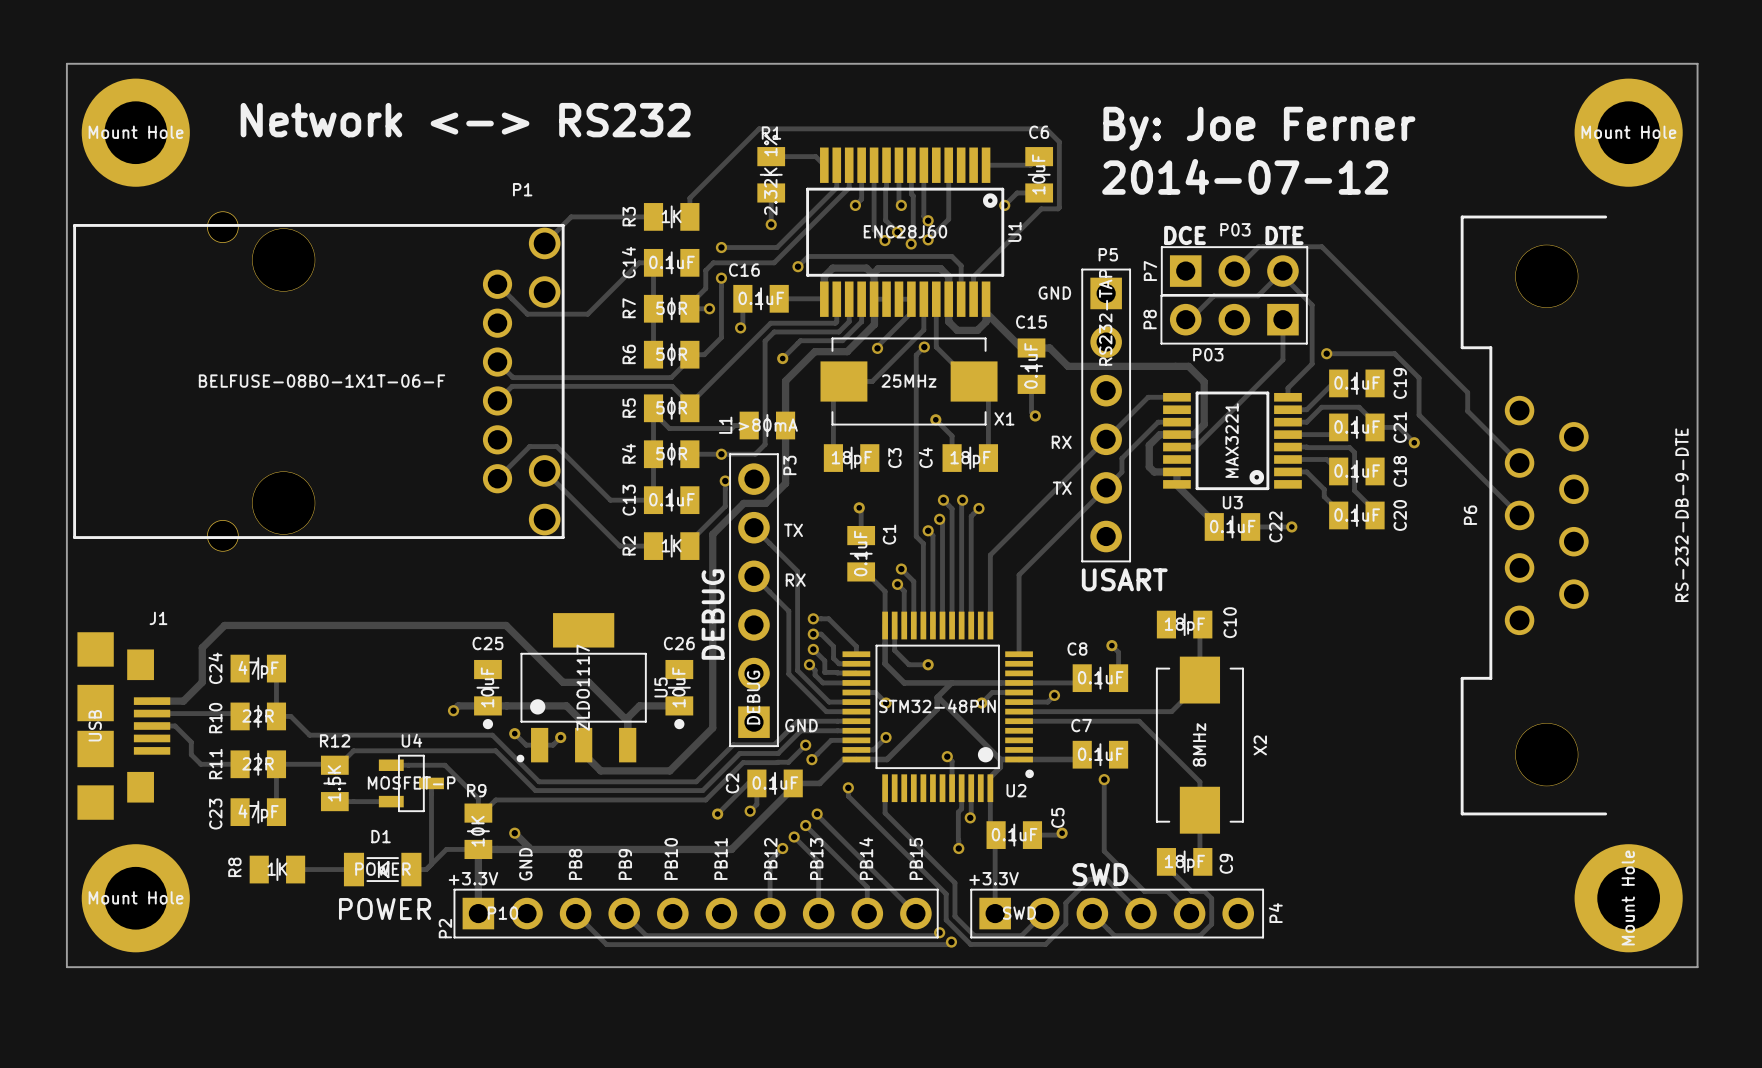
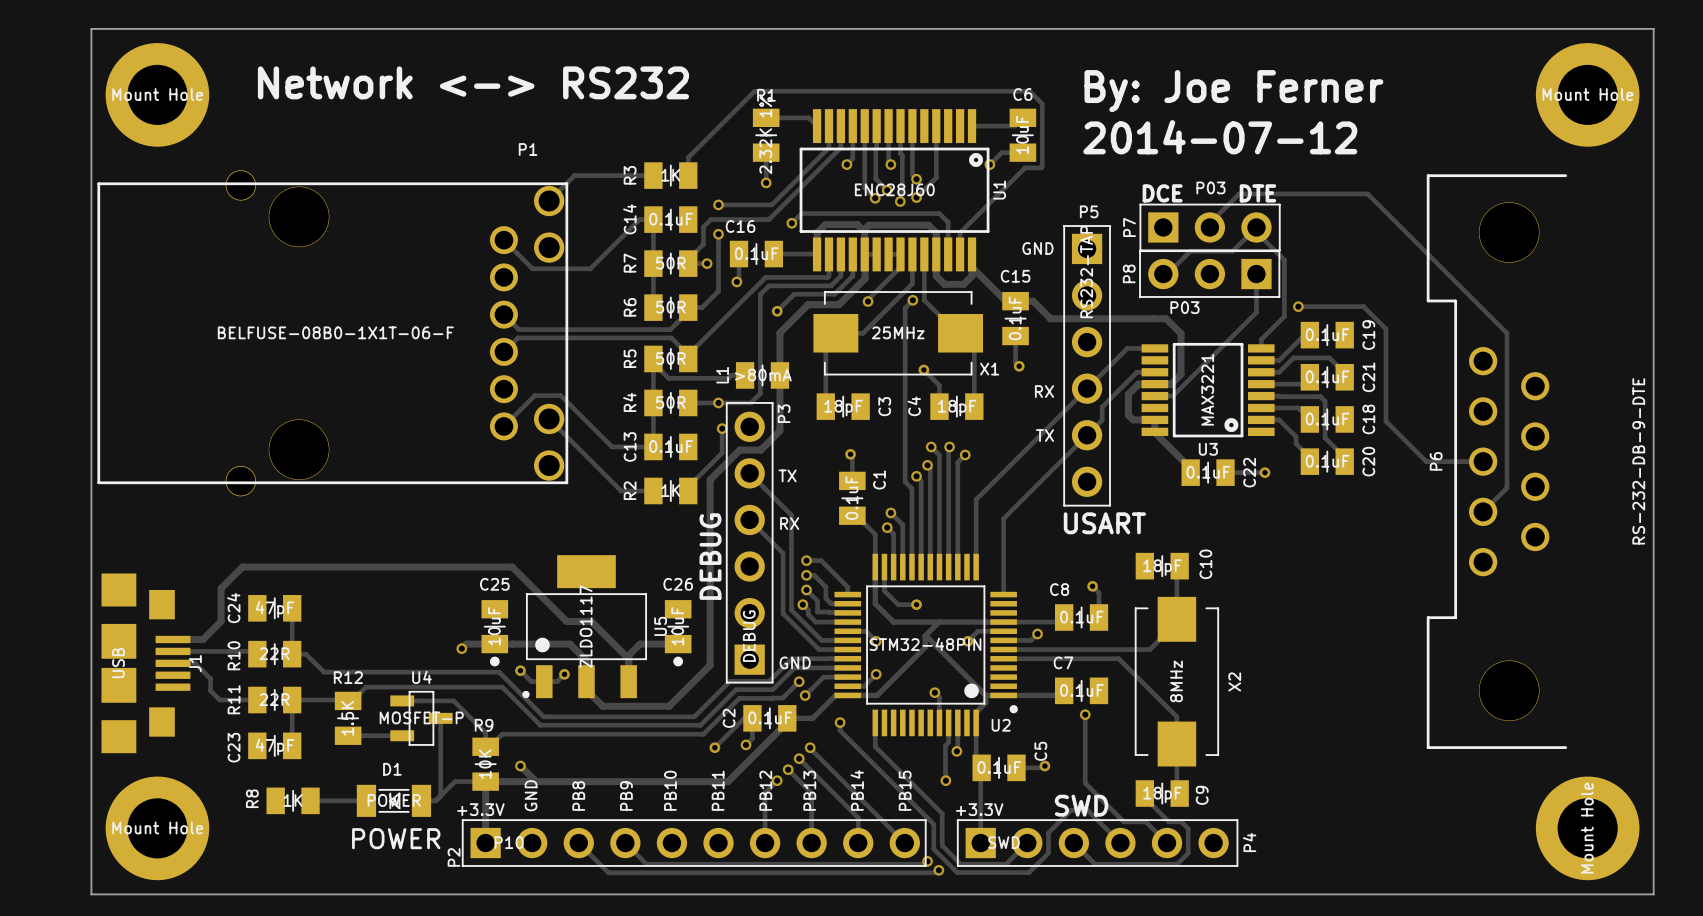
track: (1234, 271) (1258, 246) (1321, 246) (1467, 392) (1467, 411) (1519, 463) -> (1209, 227) (1209, 223) (1239, 193) (1367, 193) (1506, 333) (1506, 488) (1483, 511)
track: (1418, 377) (1419, 414) (1519, 515) -> (1385, 329) (1385, 421) (1426, 461) (1483, 461)
track: (1375, 427) (1398, 427) (1414, 442) -> none
via: (1414, 442) -> none
J1 name rotation: 0° (158, 618) -> 90° counterclockwise (195, 663)
J1 name position: J1 (158, 618) -> J1 (195, 663)

